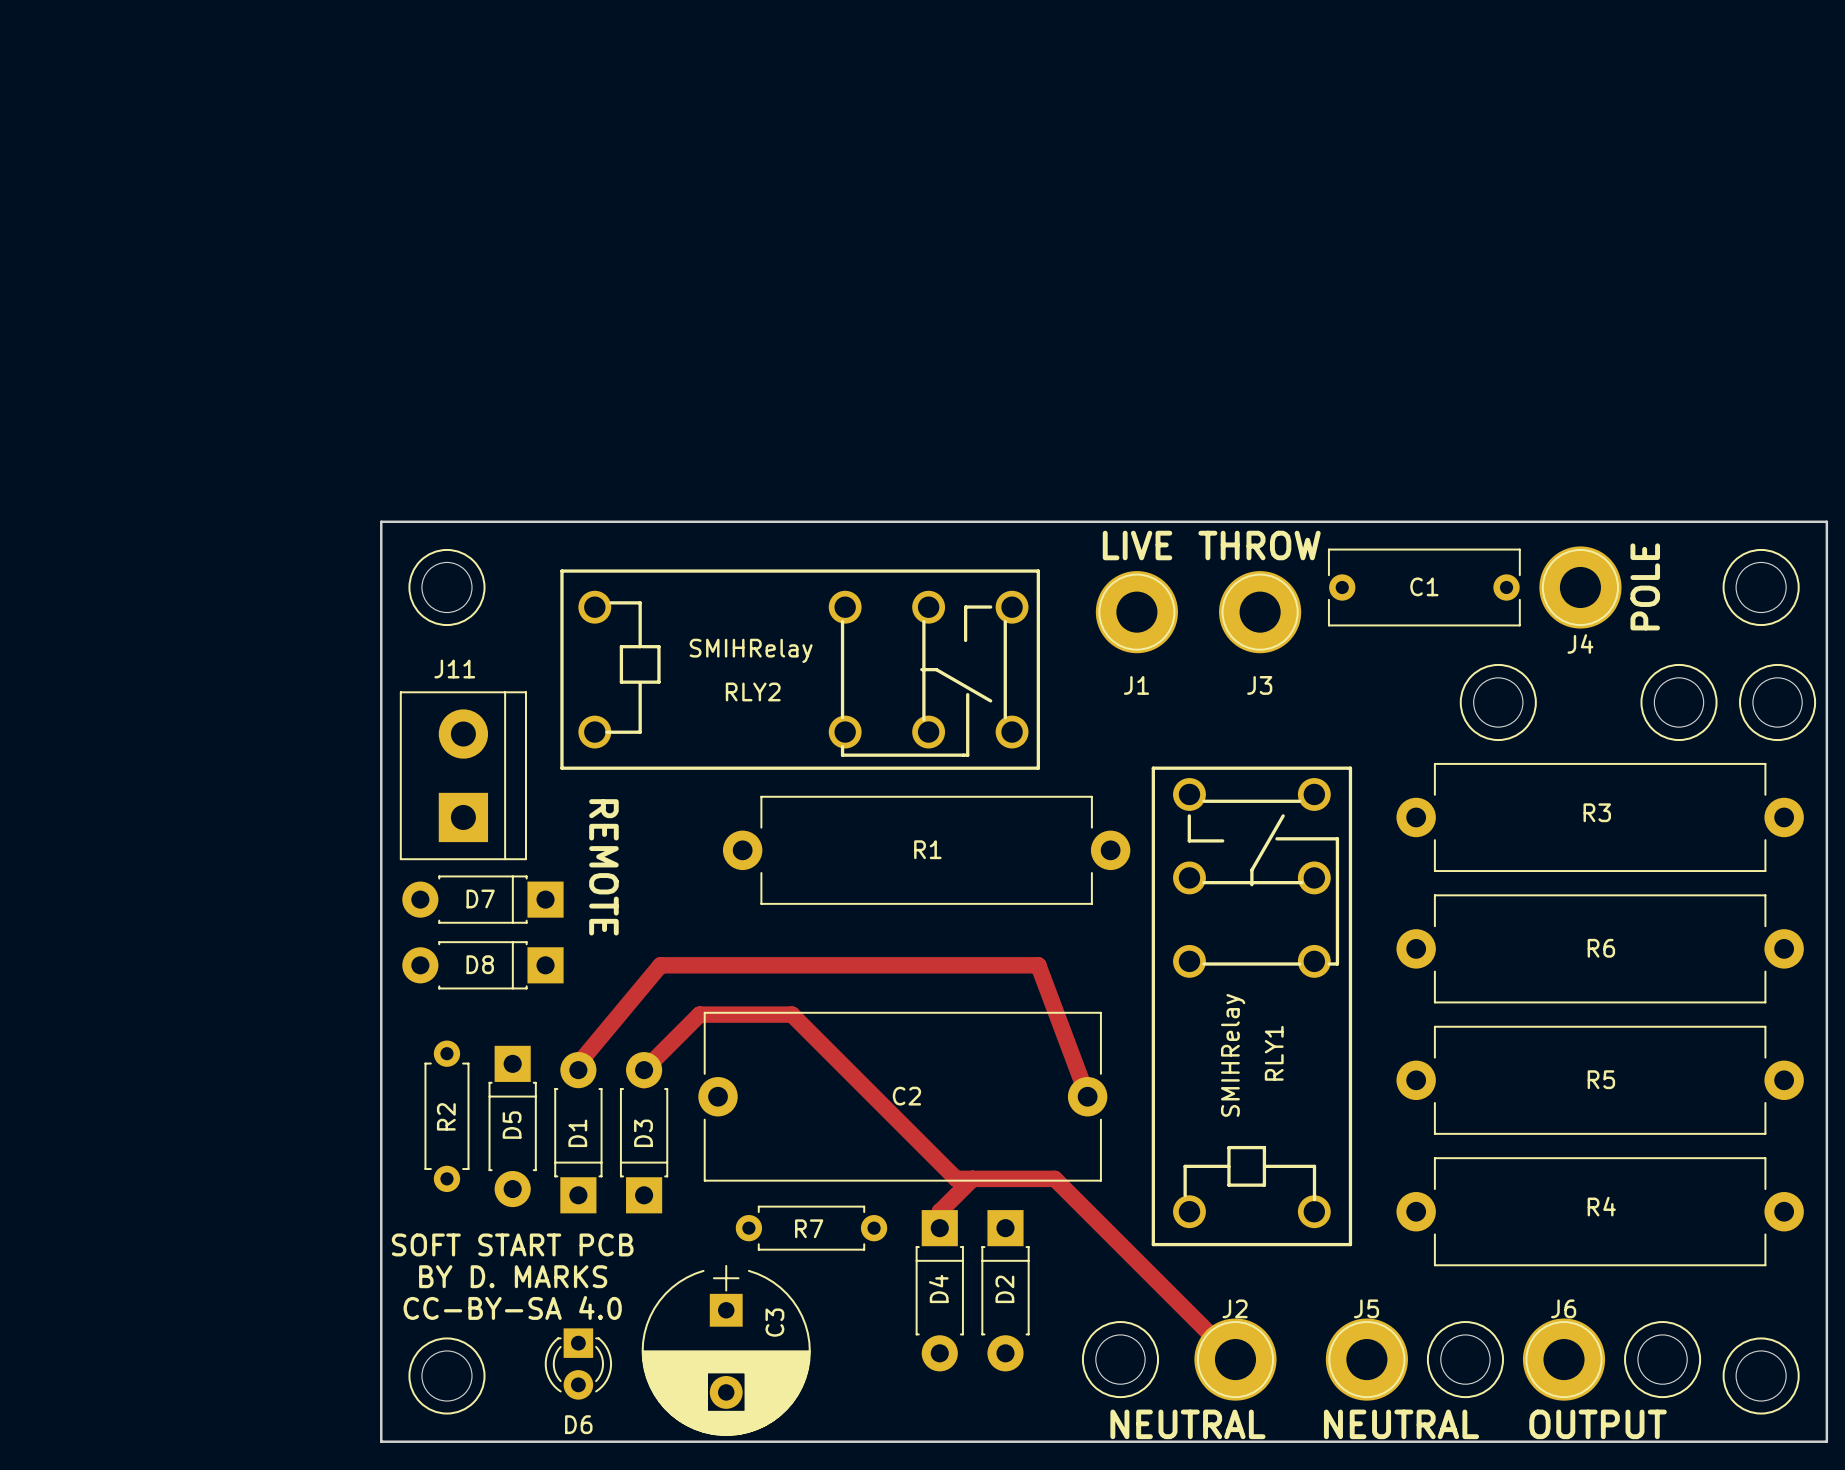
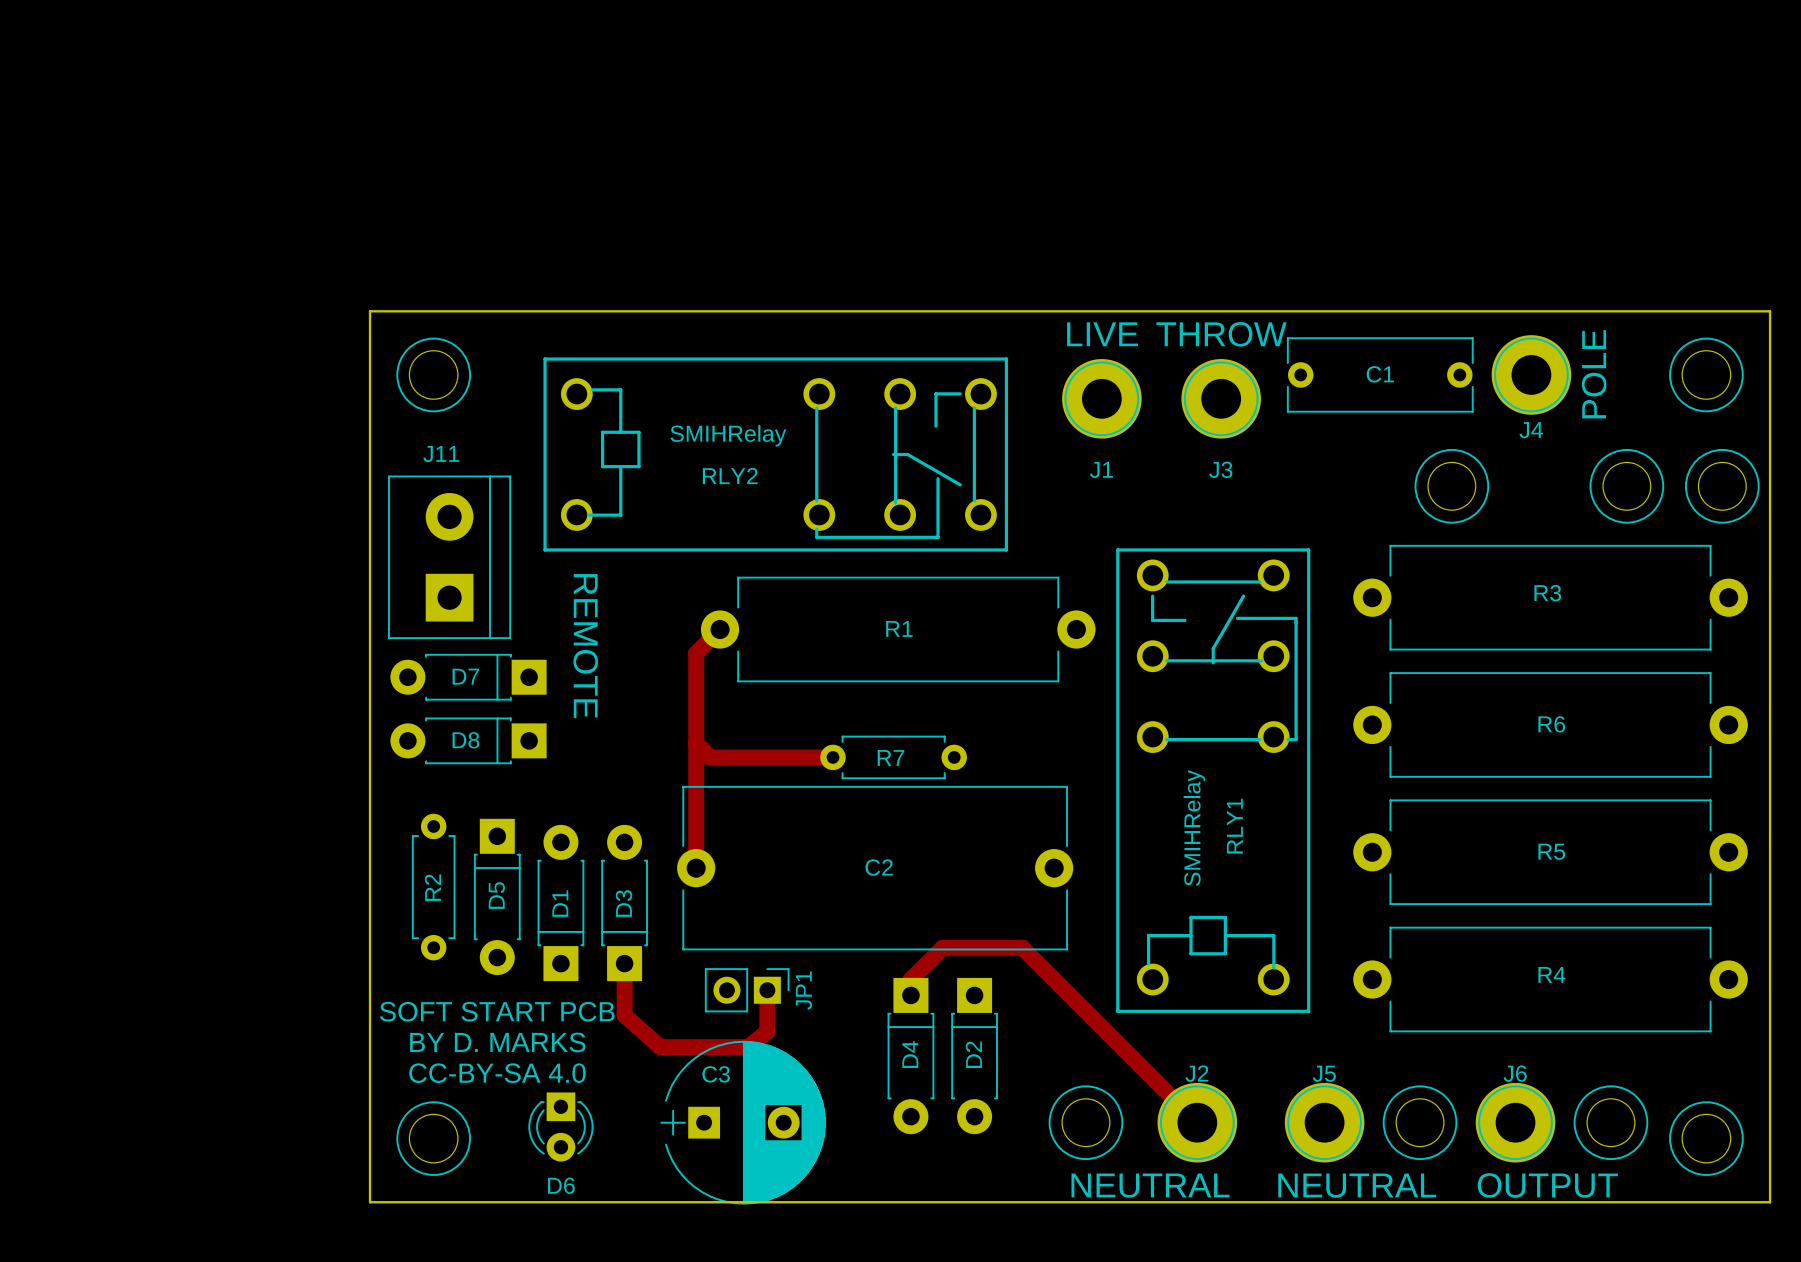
track: none -> (720, 629) (696, 653) (696, 868)
track: none -> (696, 743) (710, 757) (832, 757)
track: (578, 1063) (660, 965) (1038, 965) (1087, 1096) -> none
track: (644, 1070) (699, 1014) (791, 1014) (956, 1178) (972, 1178) -> none
track: none -> (624, 963) (624, 1015) (660, 1047) (747, 1047) (767, 1031) (767, 990)
JP1: none -> (747, 990)
R7 position: (811, 1228) -> (893, 757)
C3 rotation: 0° (726, 1350) -> 90° counterclockwise (743, 1122)

